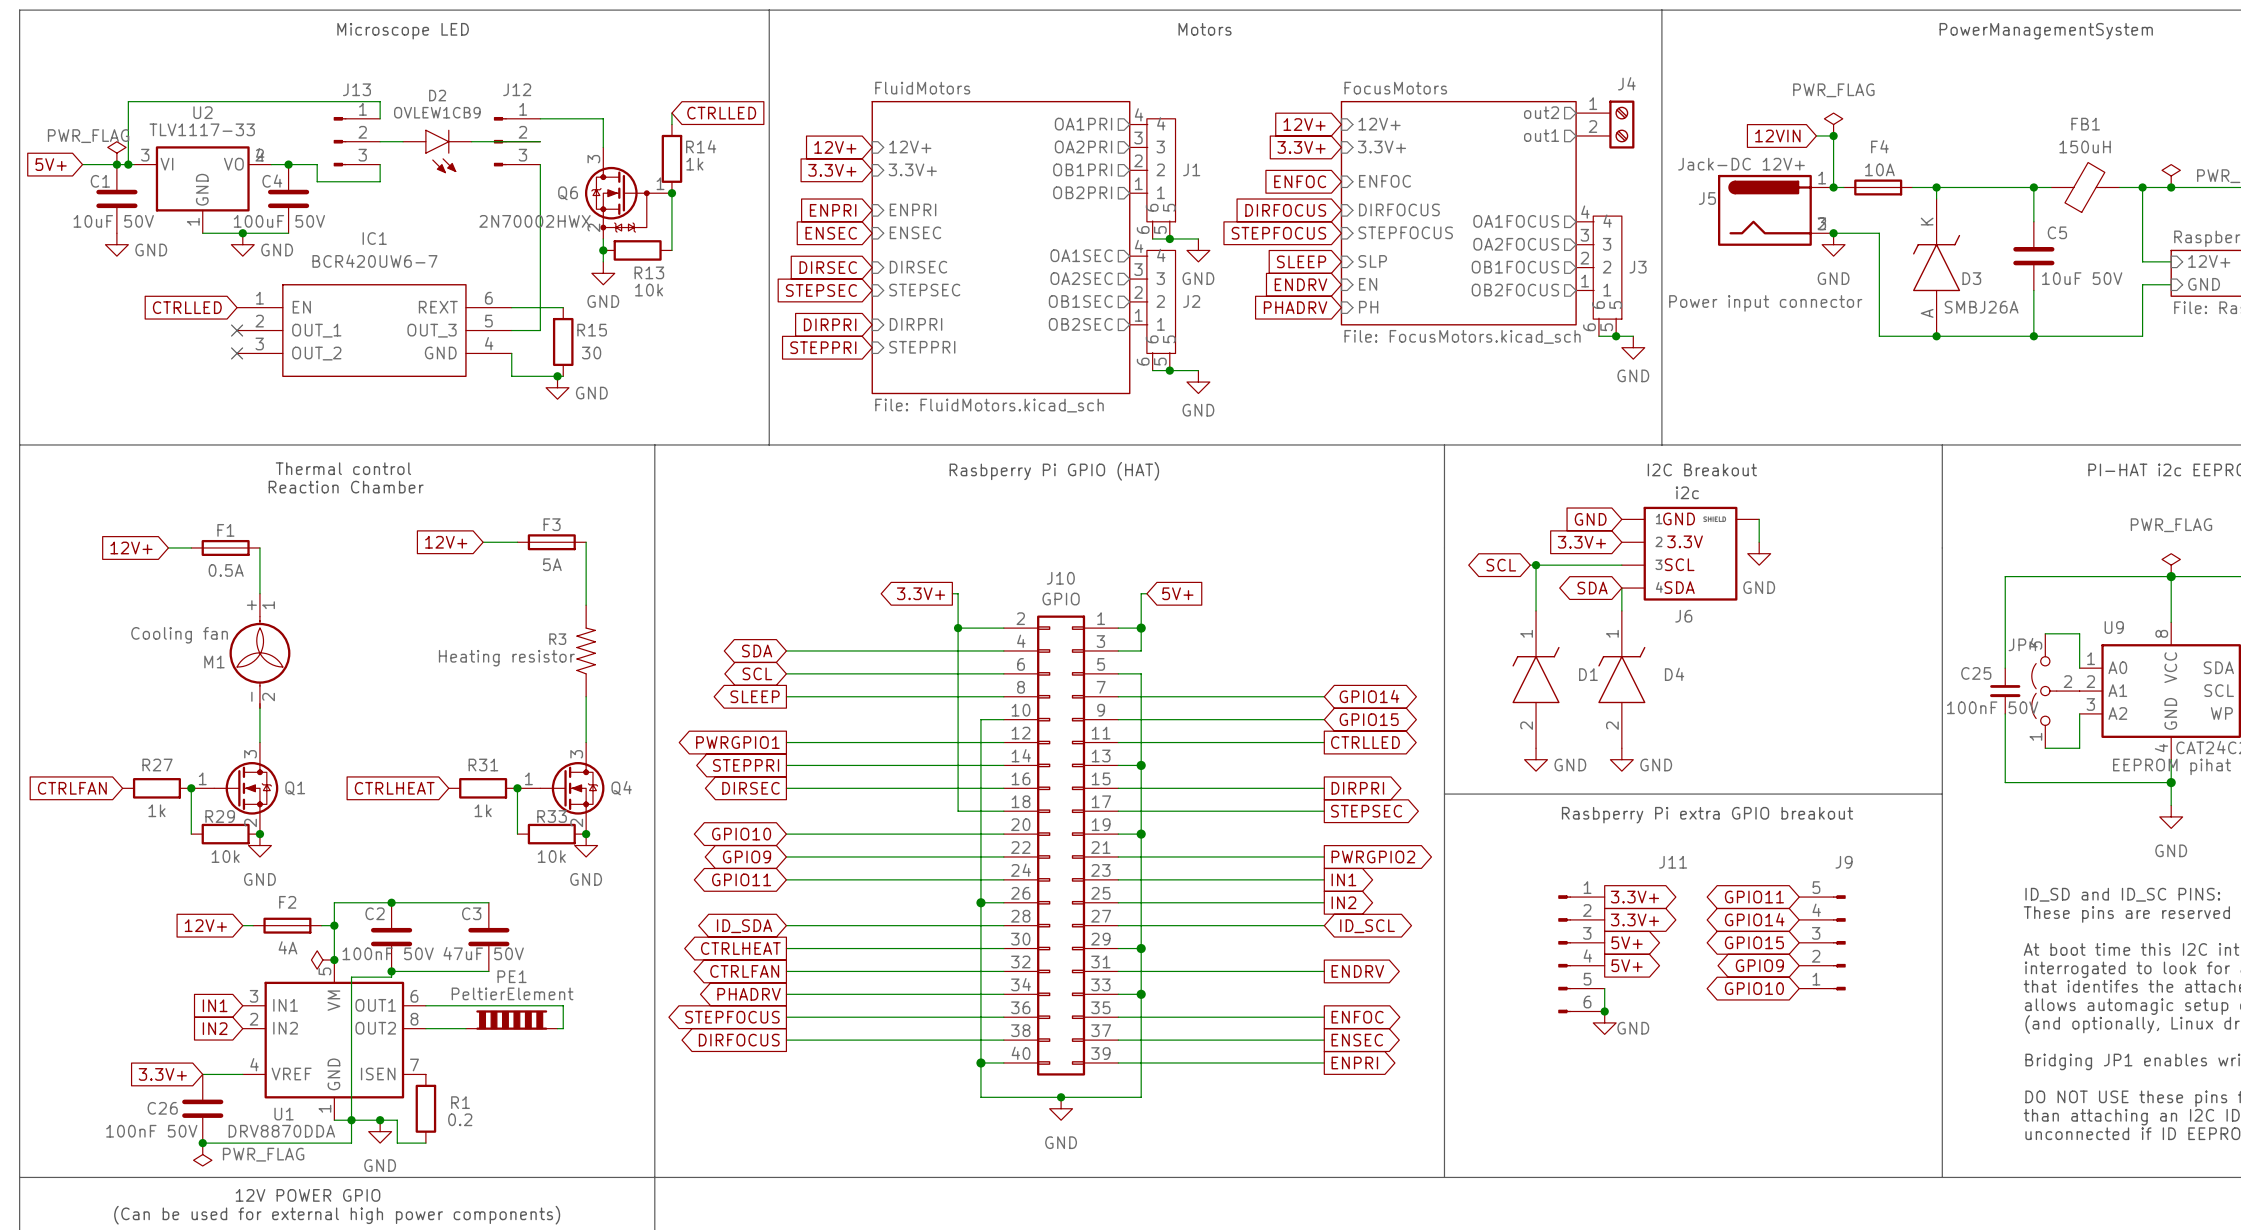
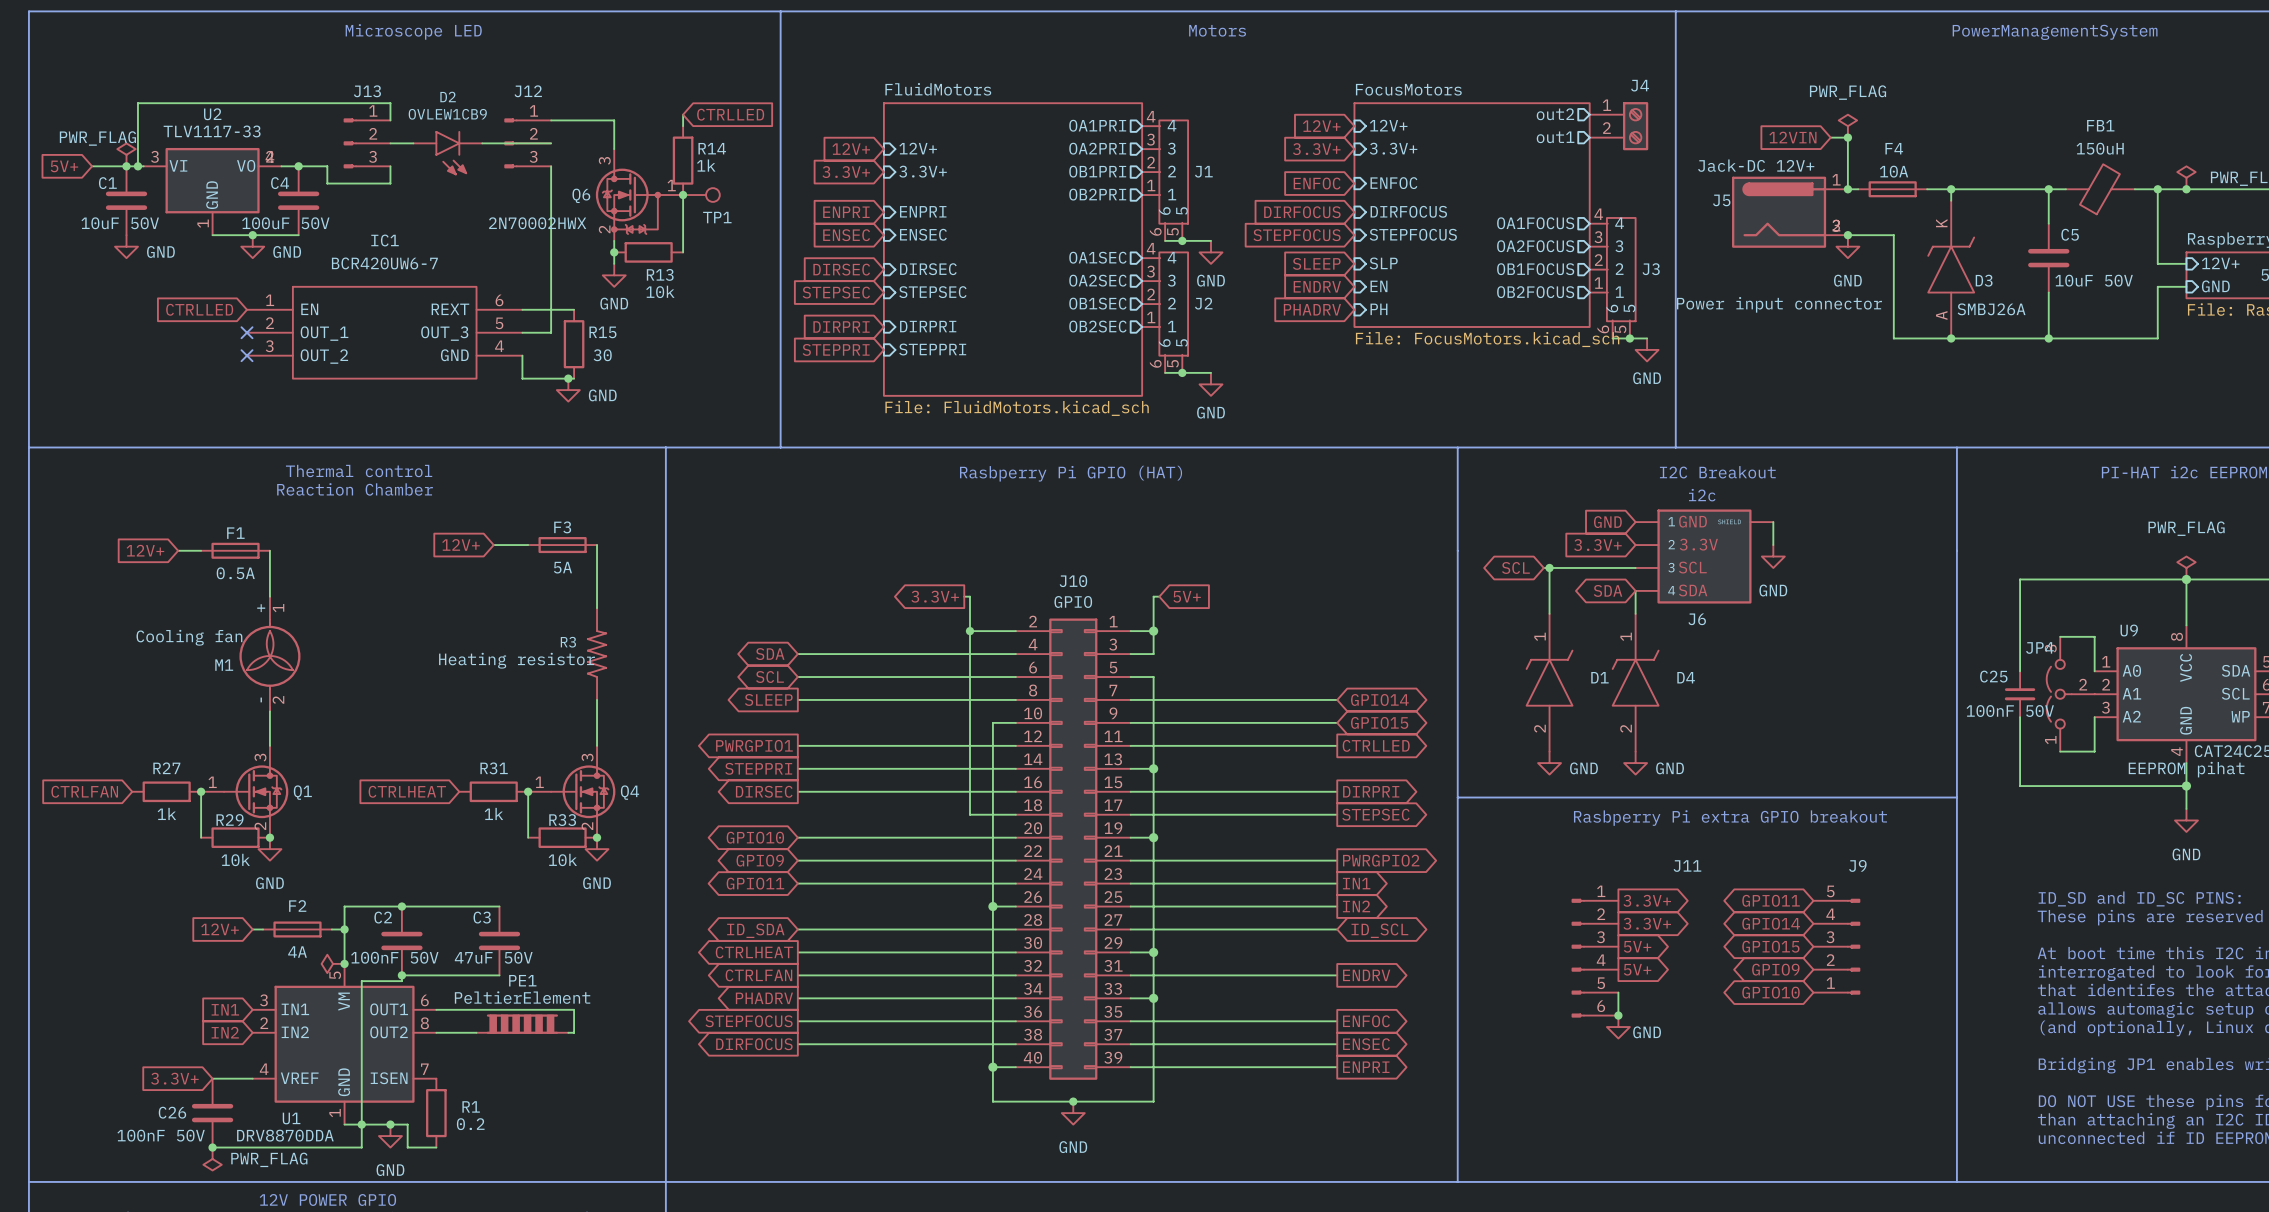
TP1: none -> (701, 195)

